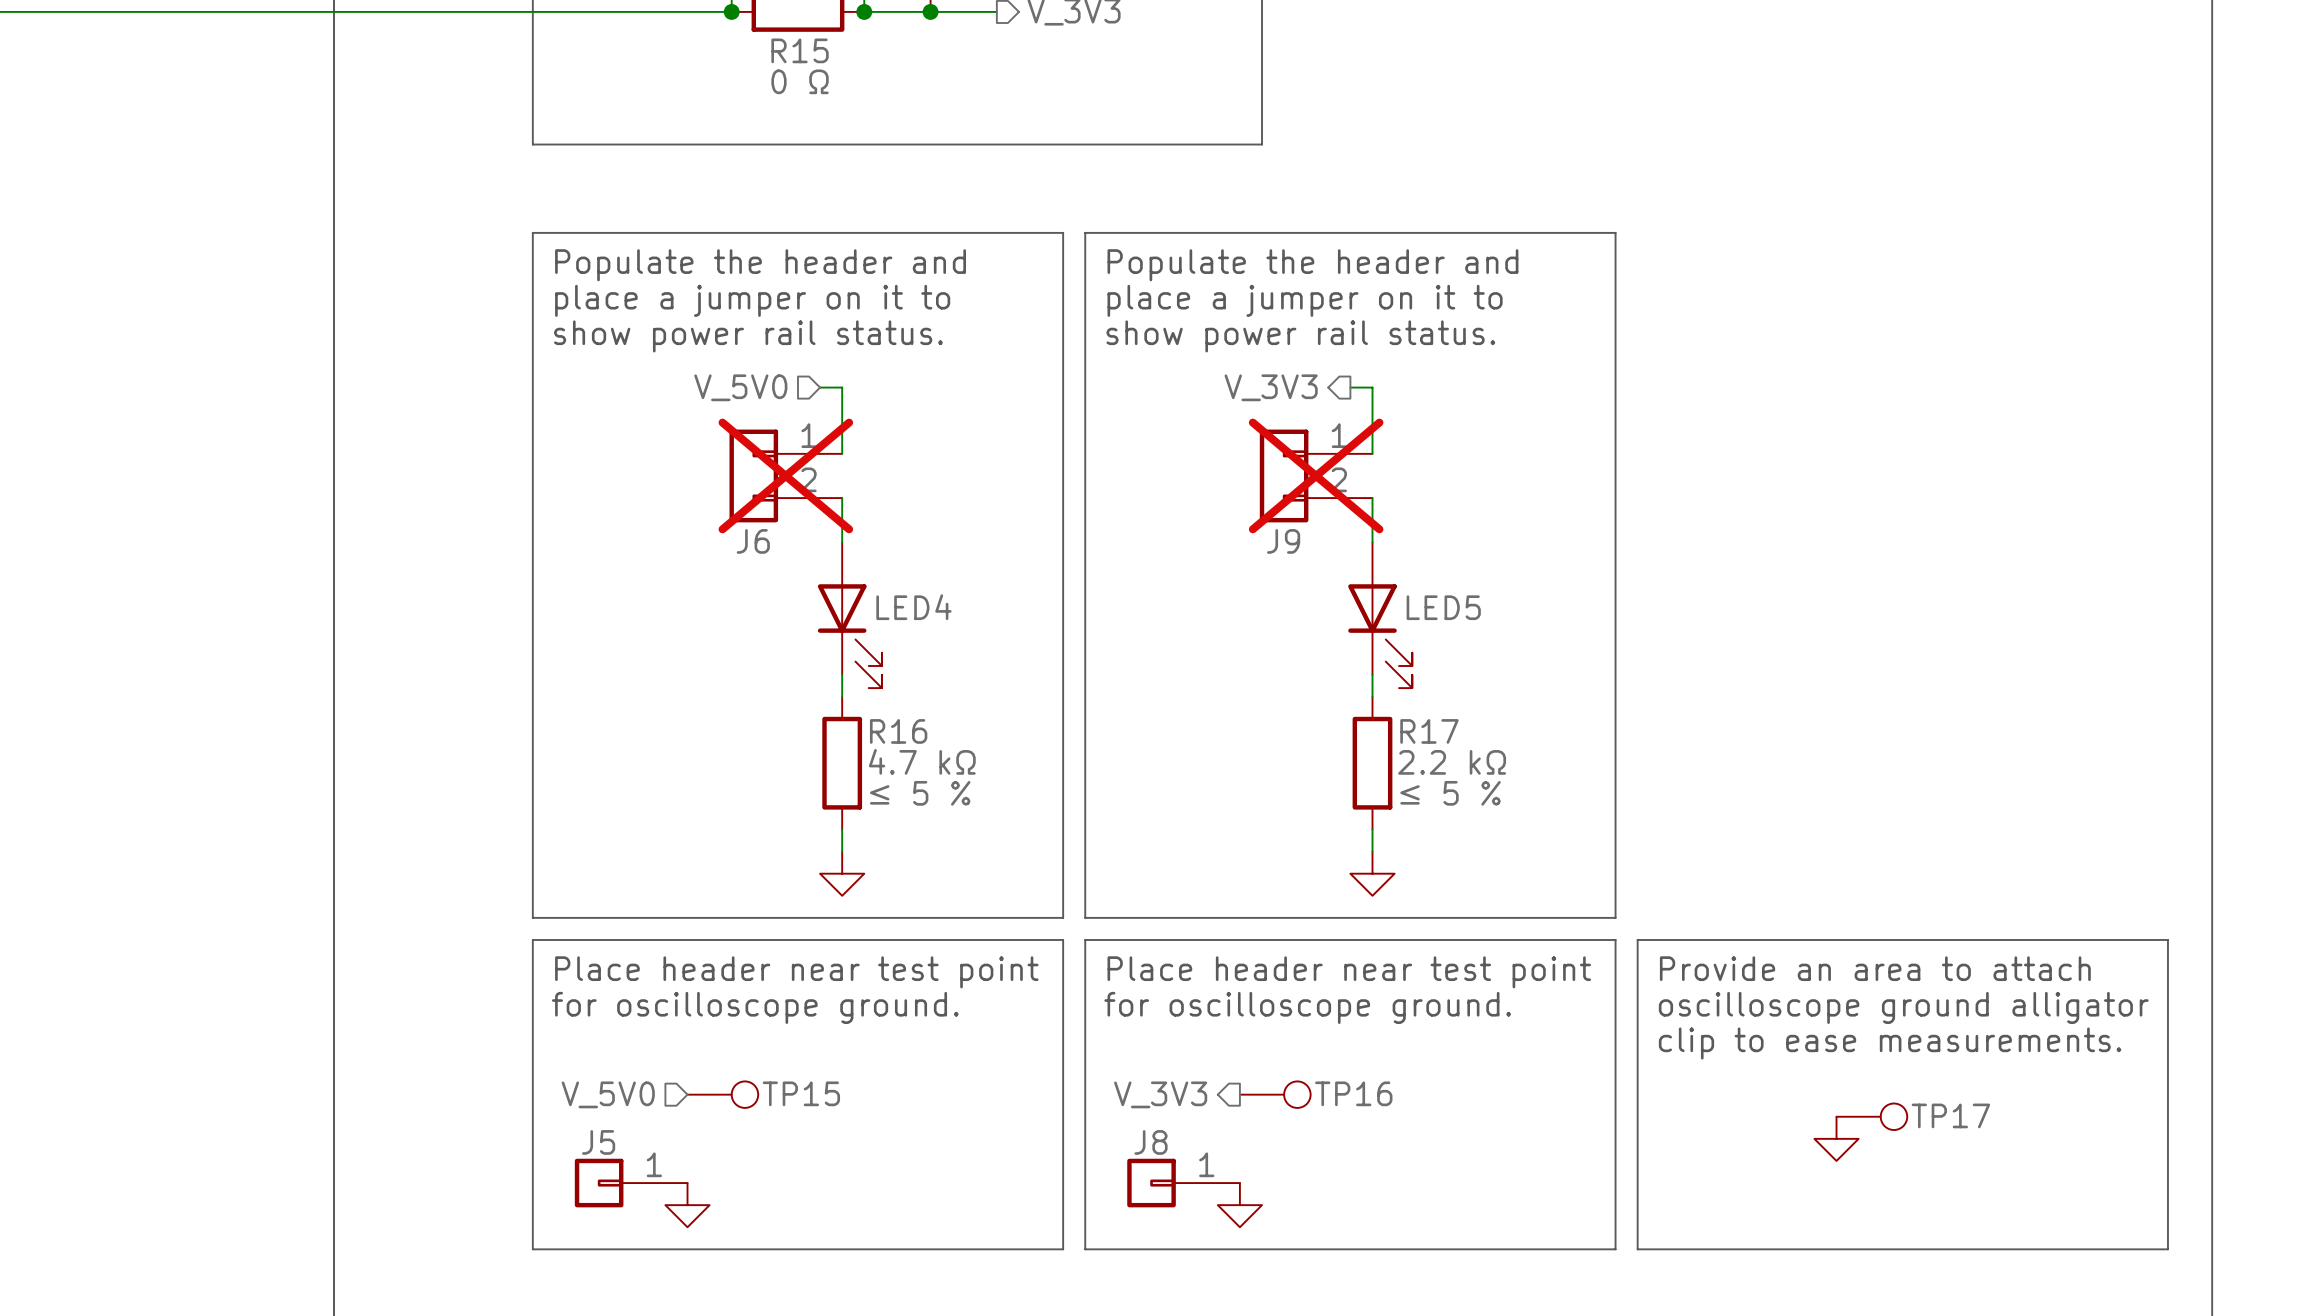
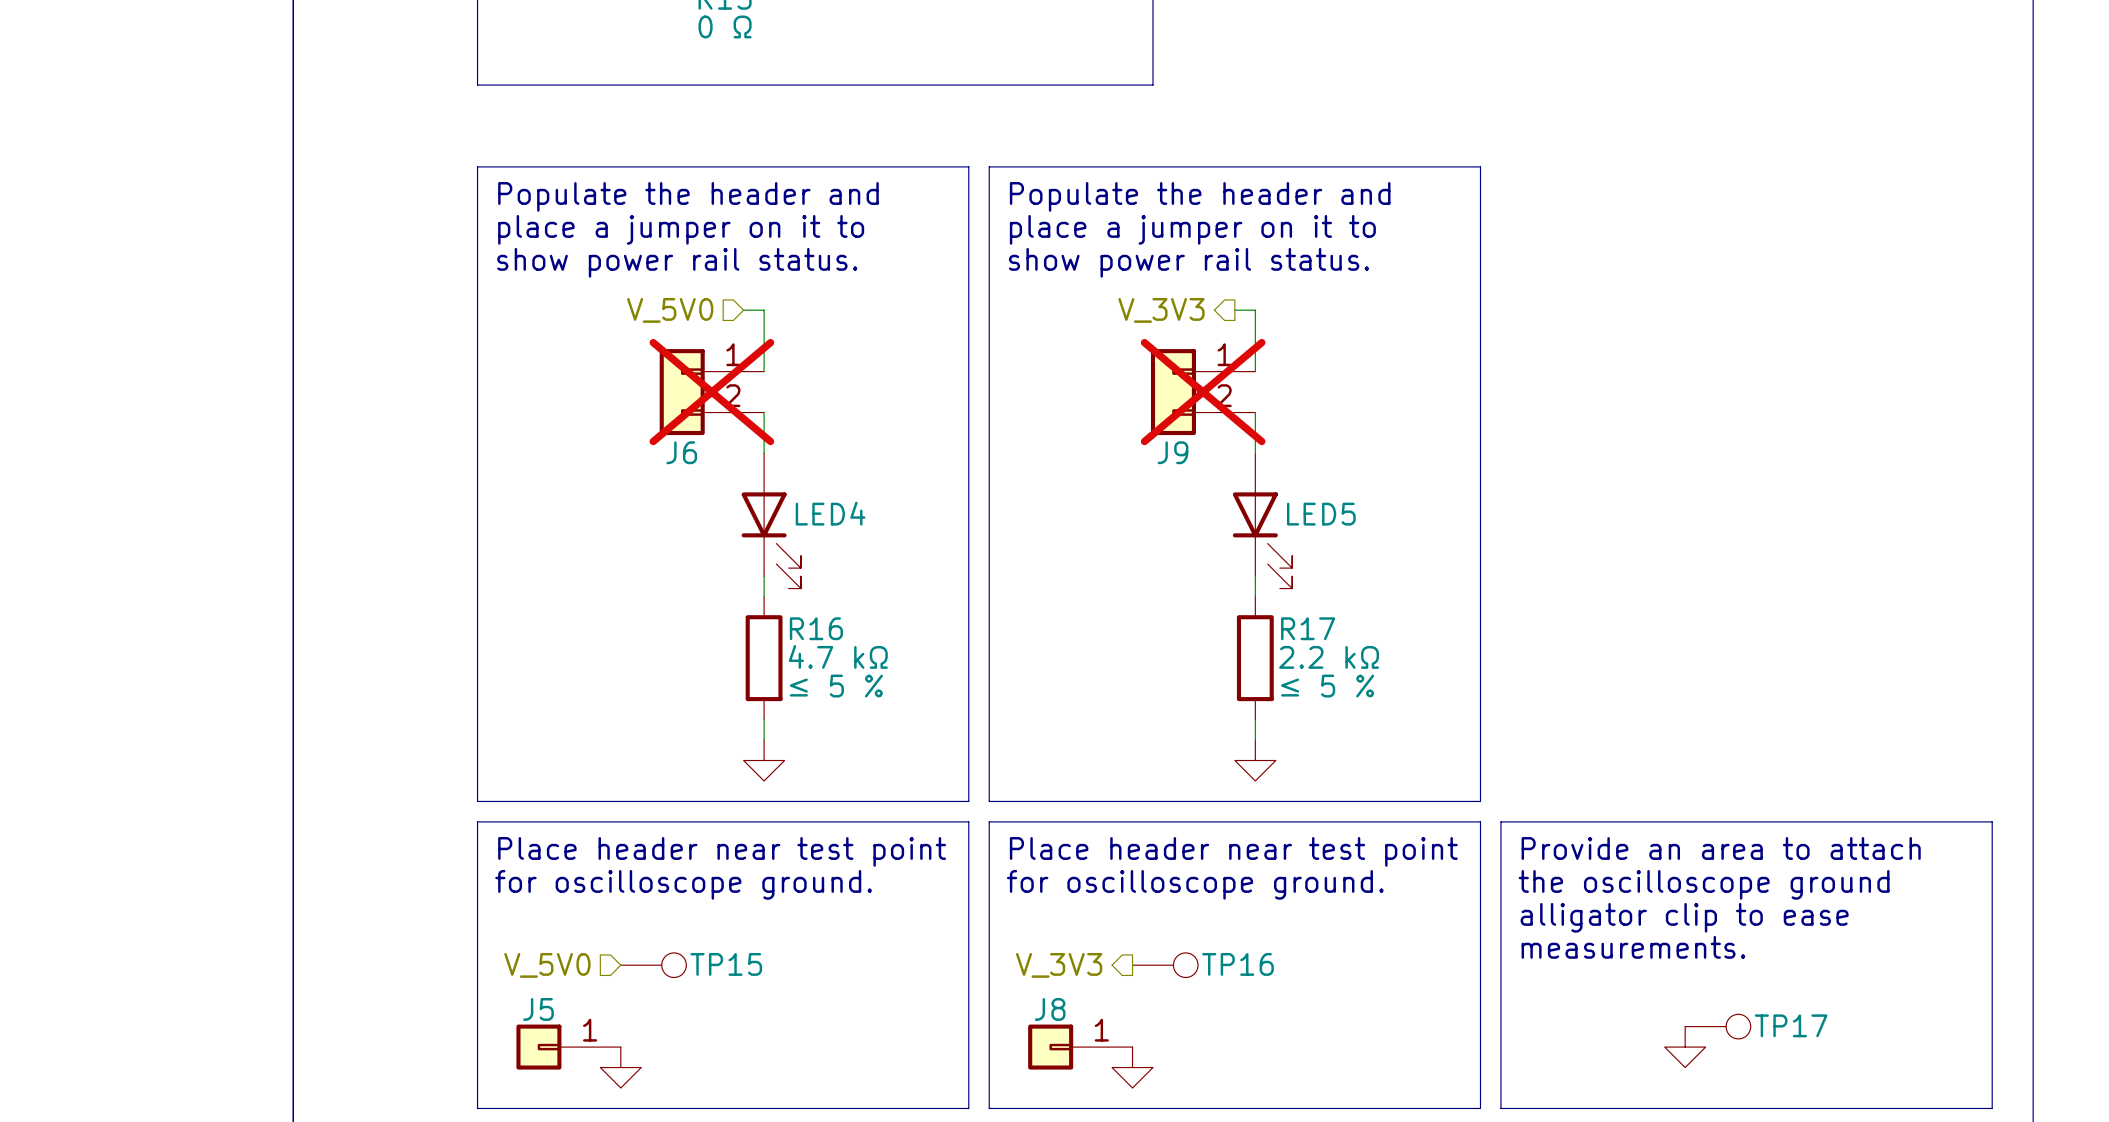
text: oscilloscope ground alligator (1903, 1007) -> the oscilloscope ground (1704, 884)
text: clip to ease measurements. (1890, 1043) -> alligator clip to ease (1684, 917)
text: none -> measurements. (1633, 947)
TP17 position: (1871, 1116) -> (1717, 1026)
power symbol position: (1836, 1138) -> (1685, 1047)

